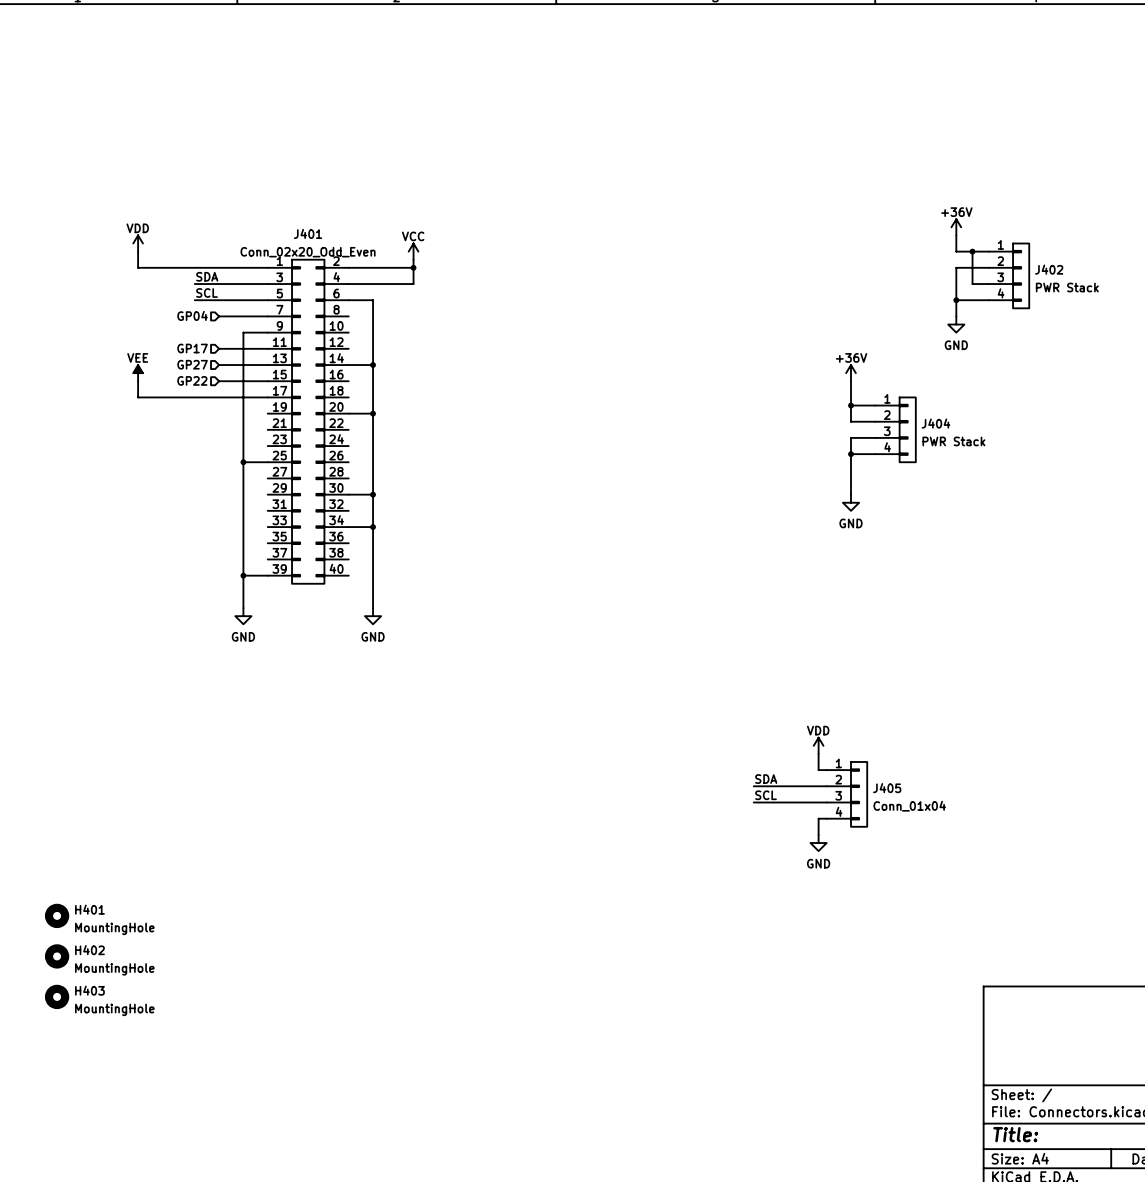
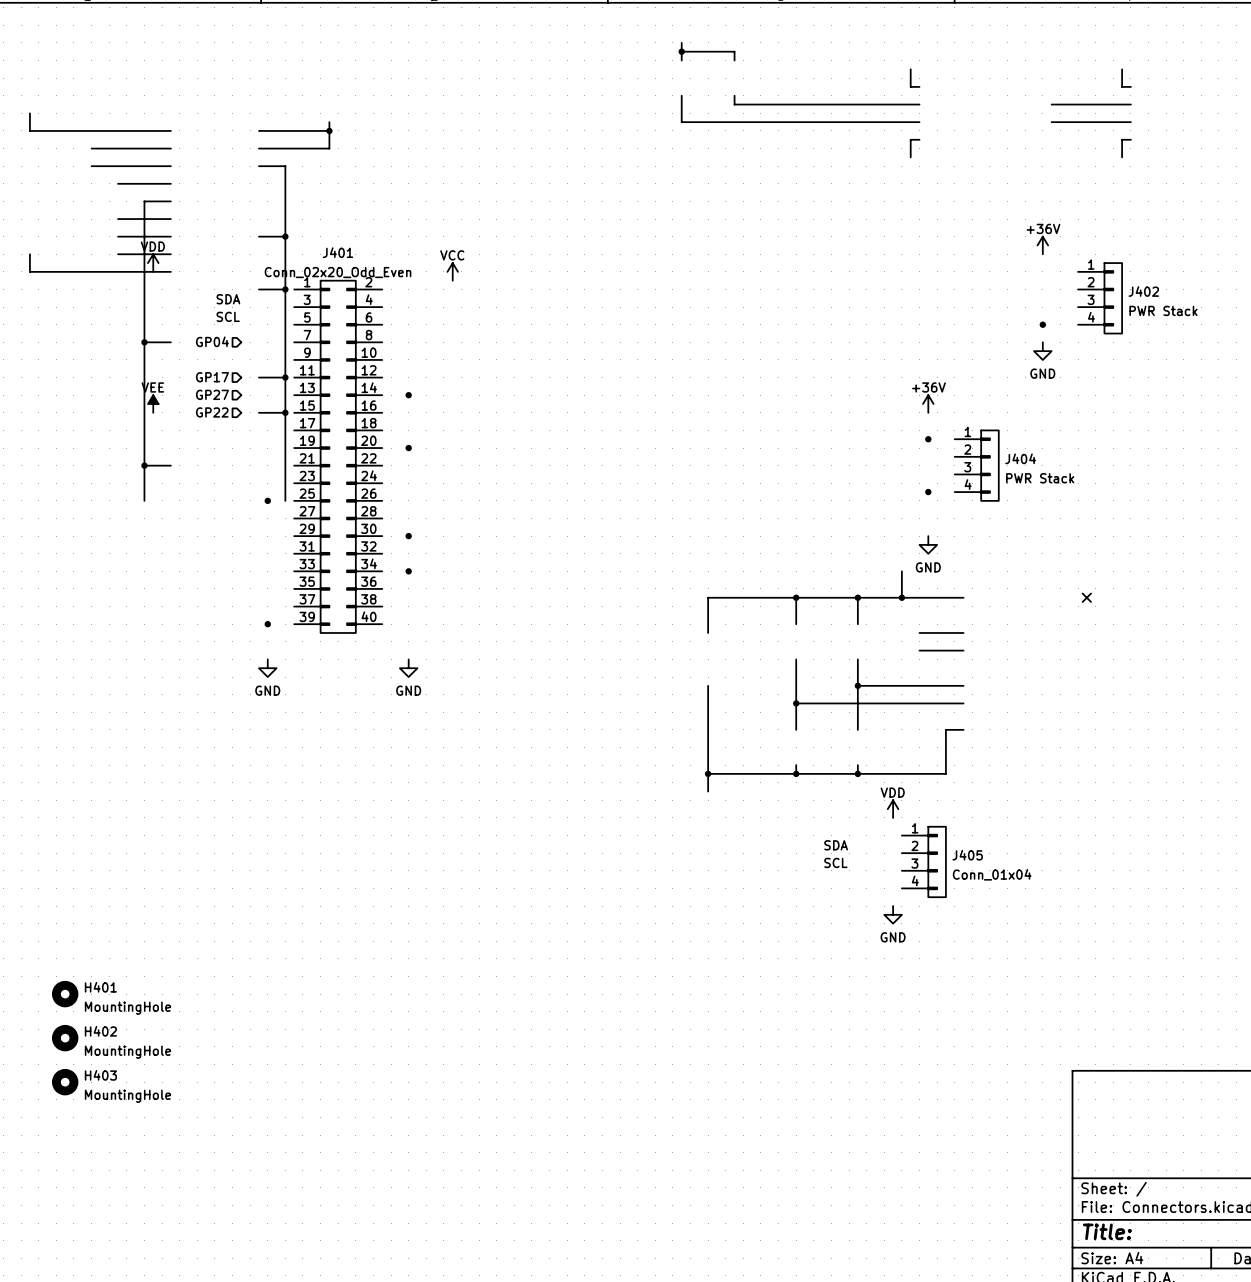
wire: none -> (681, 42) (681, 60)
wire: none -> (681, 51) (734, 51) (734, 60)
junction: none -> (681, 51)
wire: none -> (910, 69) (910, 86) (919, 86)
wire: none -> (1122, 69) (1122, 86) (1130, 86)
wire: none -> (681, 95) (681, 122) (919, 122)
wire: none -> (734, 95) (734, 104) (919, 104)
wire: none -> (1051, 104) (1130, 104)
wire: none -> (29, 113) (29, 130) (170, 130)
wire: none -> (329, 122) (329, 148) (258, 148)
wire: none -> (1051, 122) (1130, 122)
wire: none -> (258, 130) (329, 130)
junction: none -> (329, 130)
wire: none -> (919, 139) (910, 139) (910, 157)
wire: none -> (1130, 139) (1122, 139) (1122, 157)
wire: none -> (91, 148) (170, 148)
wire: none -> (91, 166) (170, 166)
wire: none -> (258, 166) (285, 166) (285, 500)
wire: none -> (118, 183) (170, 183)
wire: none -> (170, 201) (144, 201) (144, 500)
wire: none -> (118, 219) (170, 219)
wire: none -> (118, 236) (170, 236)
wire: none -> (258, 236) (285, 236)
junction: none -> (285, 236)
wire: none -> (29, 254) (29, 271) (170, 271)
wire: (956, 235) (956, 251) (988, 251) -> none
wire: (138, 251) (138, 267) (235, 267) -> none
wire: (972, 251) (972, 284) (988, 284) -> none
junction: (972, 251) -> none
wire: (413, 259) (413, 284) (348, 284) -> none
wire: (259, 267) (267, 267) -> none
junction: none -> (285, 289)
wire: (348, 267) (413, 267) -> none
junction: (413, 267) -> none
wire: (988, 267) (956, 267) (956, 316) -> none
wire: (194, 284) (267, 284) -> none
wire: (194, 300) (267, 300) -> none
wire: (348, 300) (373, 300) (373, 608) -> none
wire: (956, 300) (988, 300) -> none
wire: none -> (144, 342) (170, 342)
junction: none -> (144, 342)
wire: (219, 316) (267, 316) -> (118, 254) (170, 254)
wire: (267, 332) (243, 332) (243, 608) -> none
wire: (219, 348) (235, 348) -> none
wire: (259, 348) (267, 348) -> none
junction: none -> (285, 377)
wire: (219, 365) (267, 365) -> none
wire: (348, 365) (373, 365) -> none
wire: (138, 381) (138, 397) (267, 397) -> none
wire: (219, 381) (235, 381) -> none
wire: (259, 381) (267, 381) -> none
junction: none -> (285, 412)
wire: (851, 381) (851, 421) (875, 421) -> none
wire: (851, 405) (875, 405) -> none
wire: (348, 413) (373, 413) -> none
junction: none -> (144, 465)
wire: (875, 437) (851, 437) (851, 494) -> none
wire: (851, 454) (875, 454) -> none
wire: (243, 462) (267, 462) -> (144, 465) (170, 465)
wire: (348, 494) (373, 494) -> none
wire: (348, 527) (373, 527) -> none
wire: none -> (901, 571) (901, 597)
wire: none -> (796, 597) (796, 624)
junction: none -> (796, 597)
wire: none -> (857, 597) (857, 624)
junction: none -> (857, 597)
junction: none -> (901, 597)
wire: none -> (963, 597) (708, 597) (708, 632)
no-connect mark: none -> (1086, 597)
wire: (243, 575) (267, 575) -> none
wire: none -> (919, 632) (963, 632)
wire: none -> (919, 650) (963, 650)
wire: none -> (796, 659) (796, 729)
wire: none -> (857, 659) (857, 729)
wire: none -> (708, 685) (708, 791)
wire: none -> (857, 685) (963, 685)
junction: none -> (857, 685)
wire: none -> (796, 703) (963, 703)
junction: none -> (796, 703)
wire: none -> (963, 729) (945, 729) (945, 773) (708, 773)
wire: none -> (796, 765) (796, 773)
wire: none -> (857, 765) (857, 773)
junction: none -> (708, 773)
junction: none -> (796, 773)
junction: none -> (857, 773)
wire: (818, 753) (818, 770) (826, 770) -> none
wire: (753, 786) (826, 786) -> none
wire: (753, 802) (826, 802) -> none
wire: (826, 818) (818, 818) (818, 834) -> none

